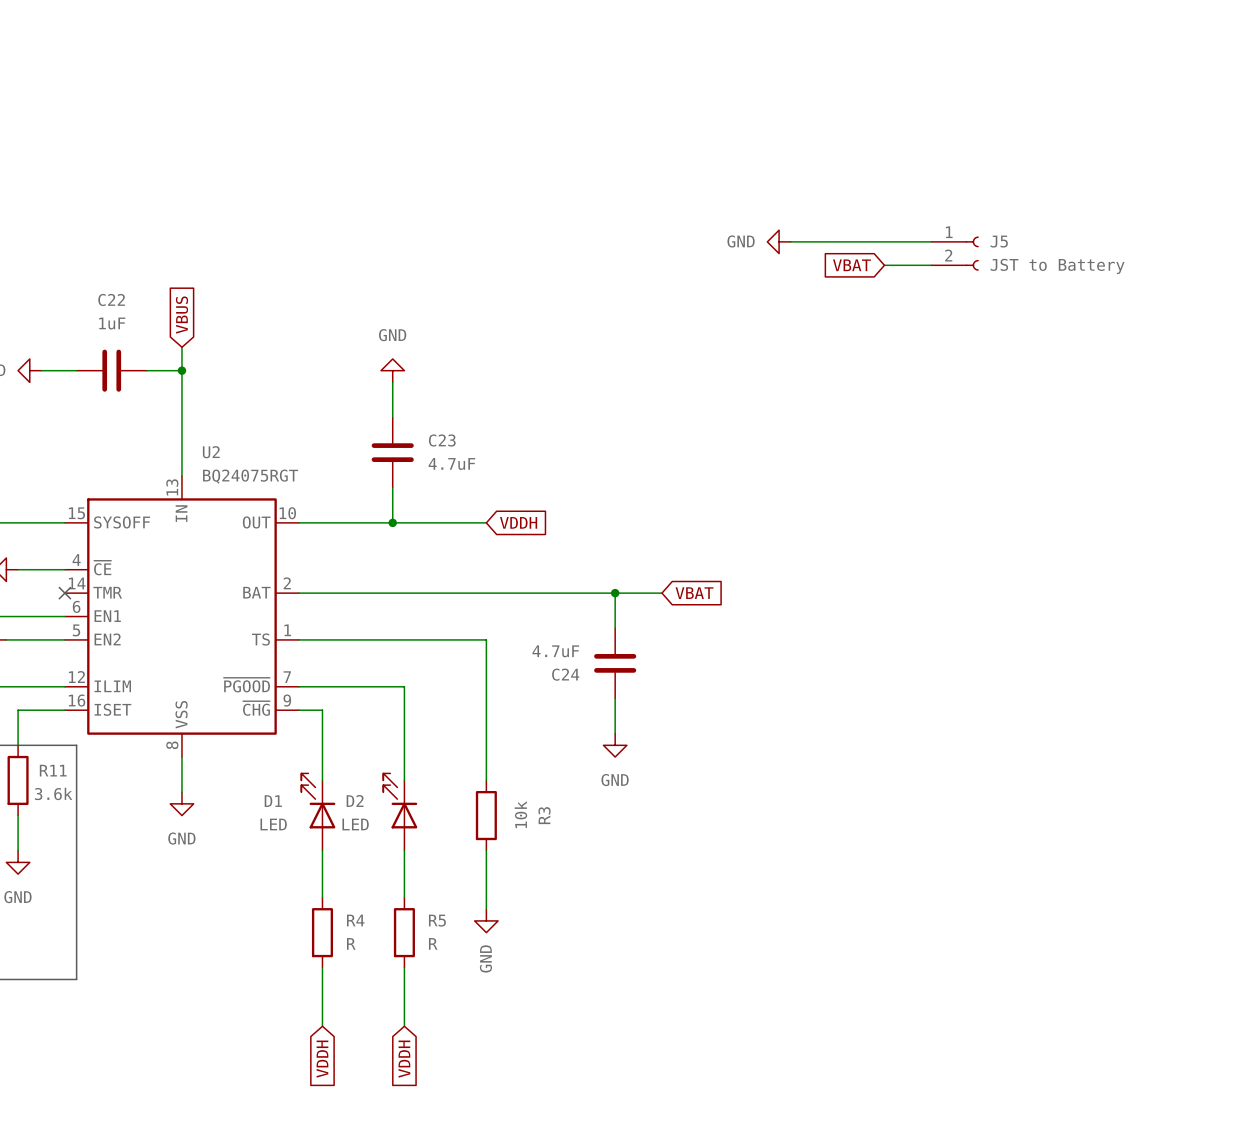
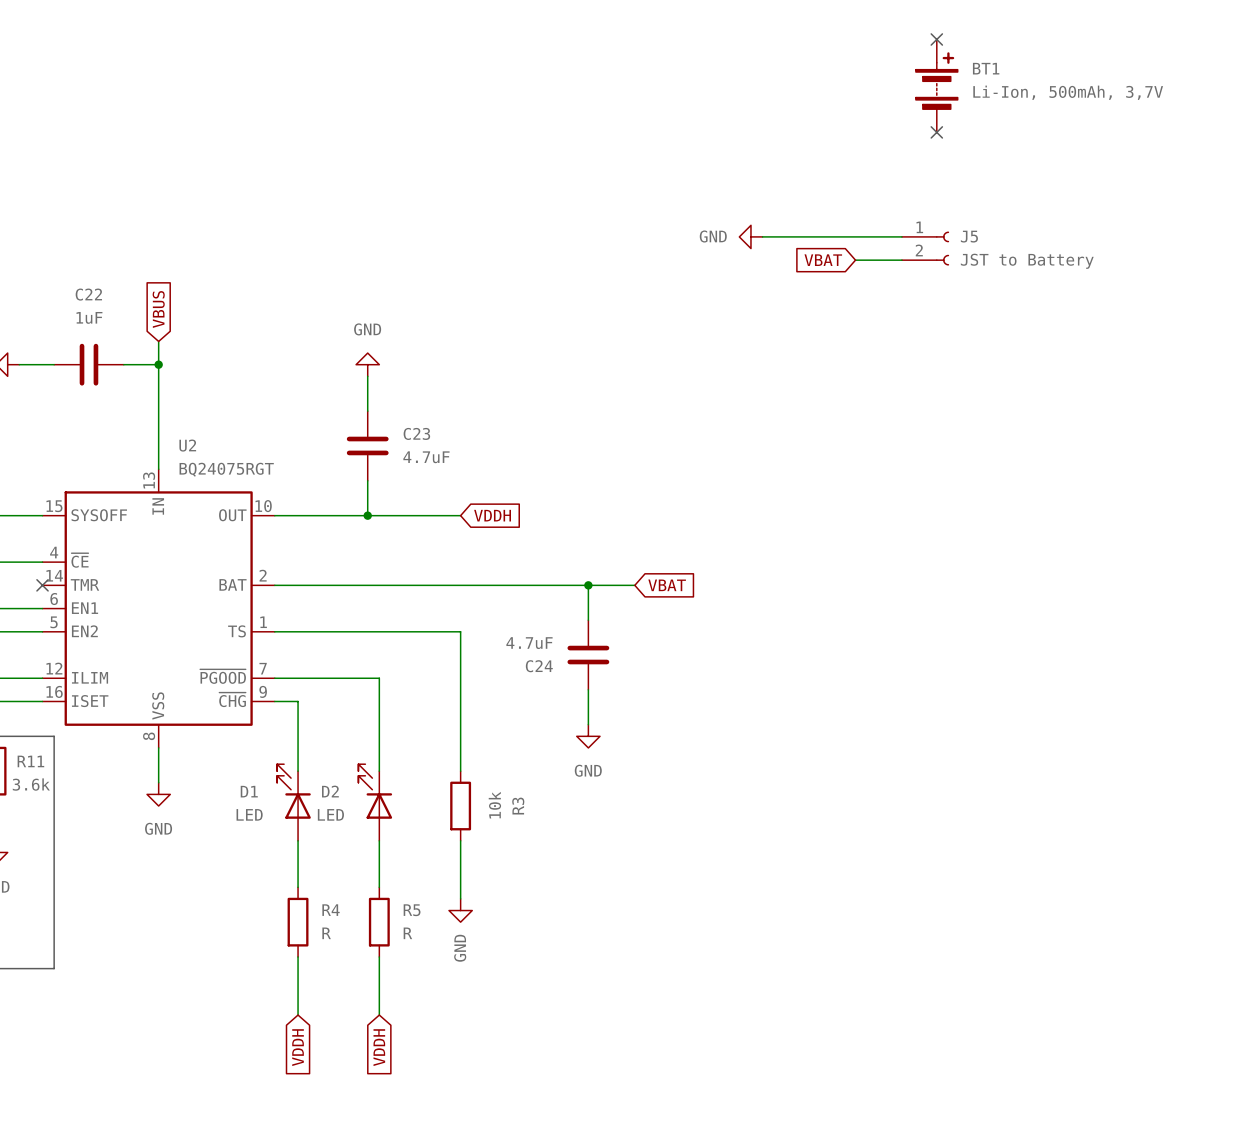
no-connect mark: none -> (936, 39)
BT1: none -> Li-Ion, 500mAh, 3,7V (936, 85)
no-connect mark: none -> (936, 132)

